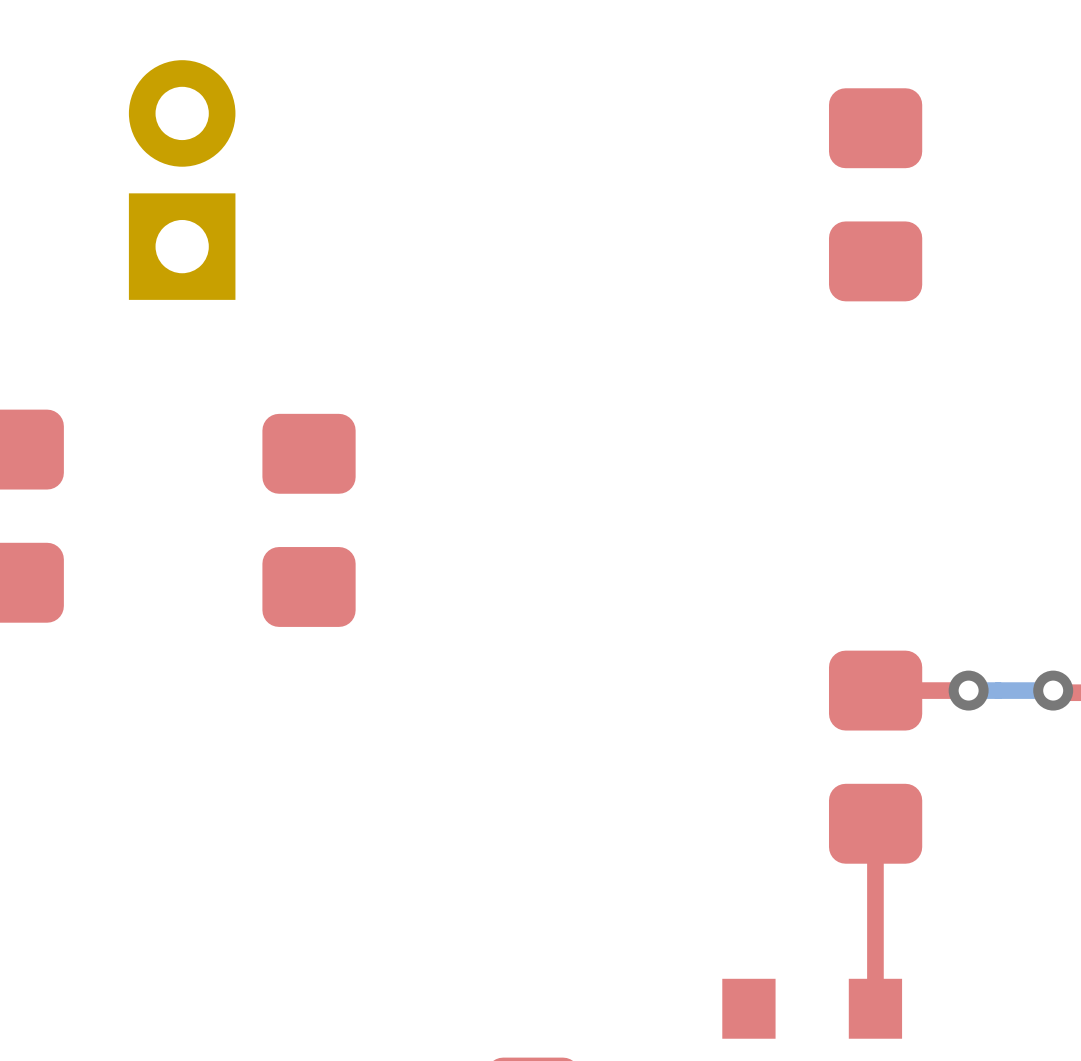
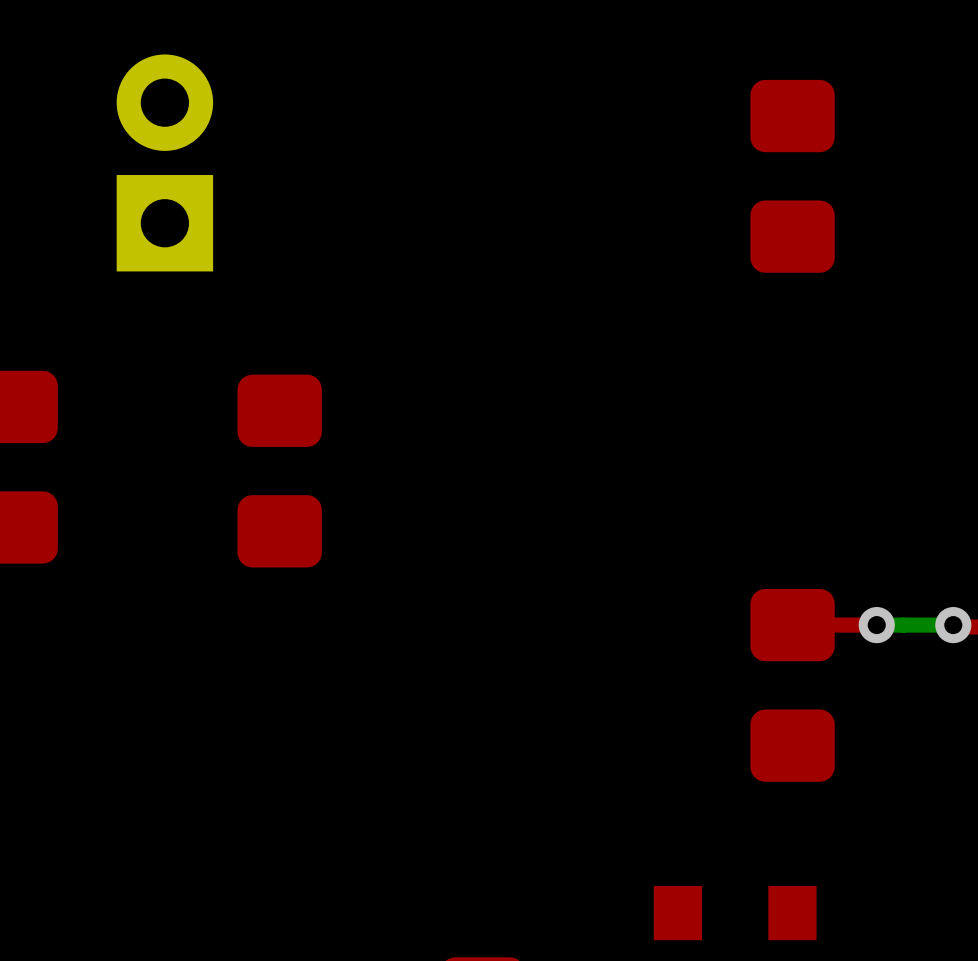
top track: (875, 823) (875, 1008) -> none

